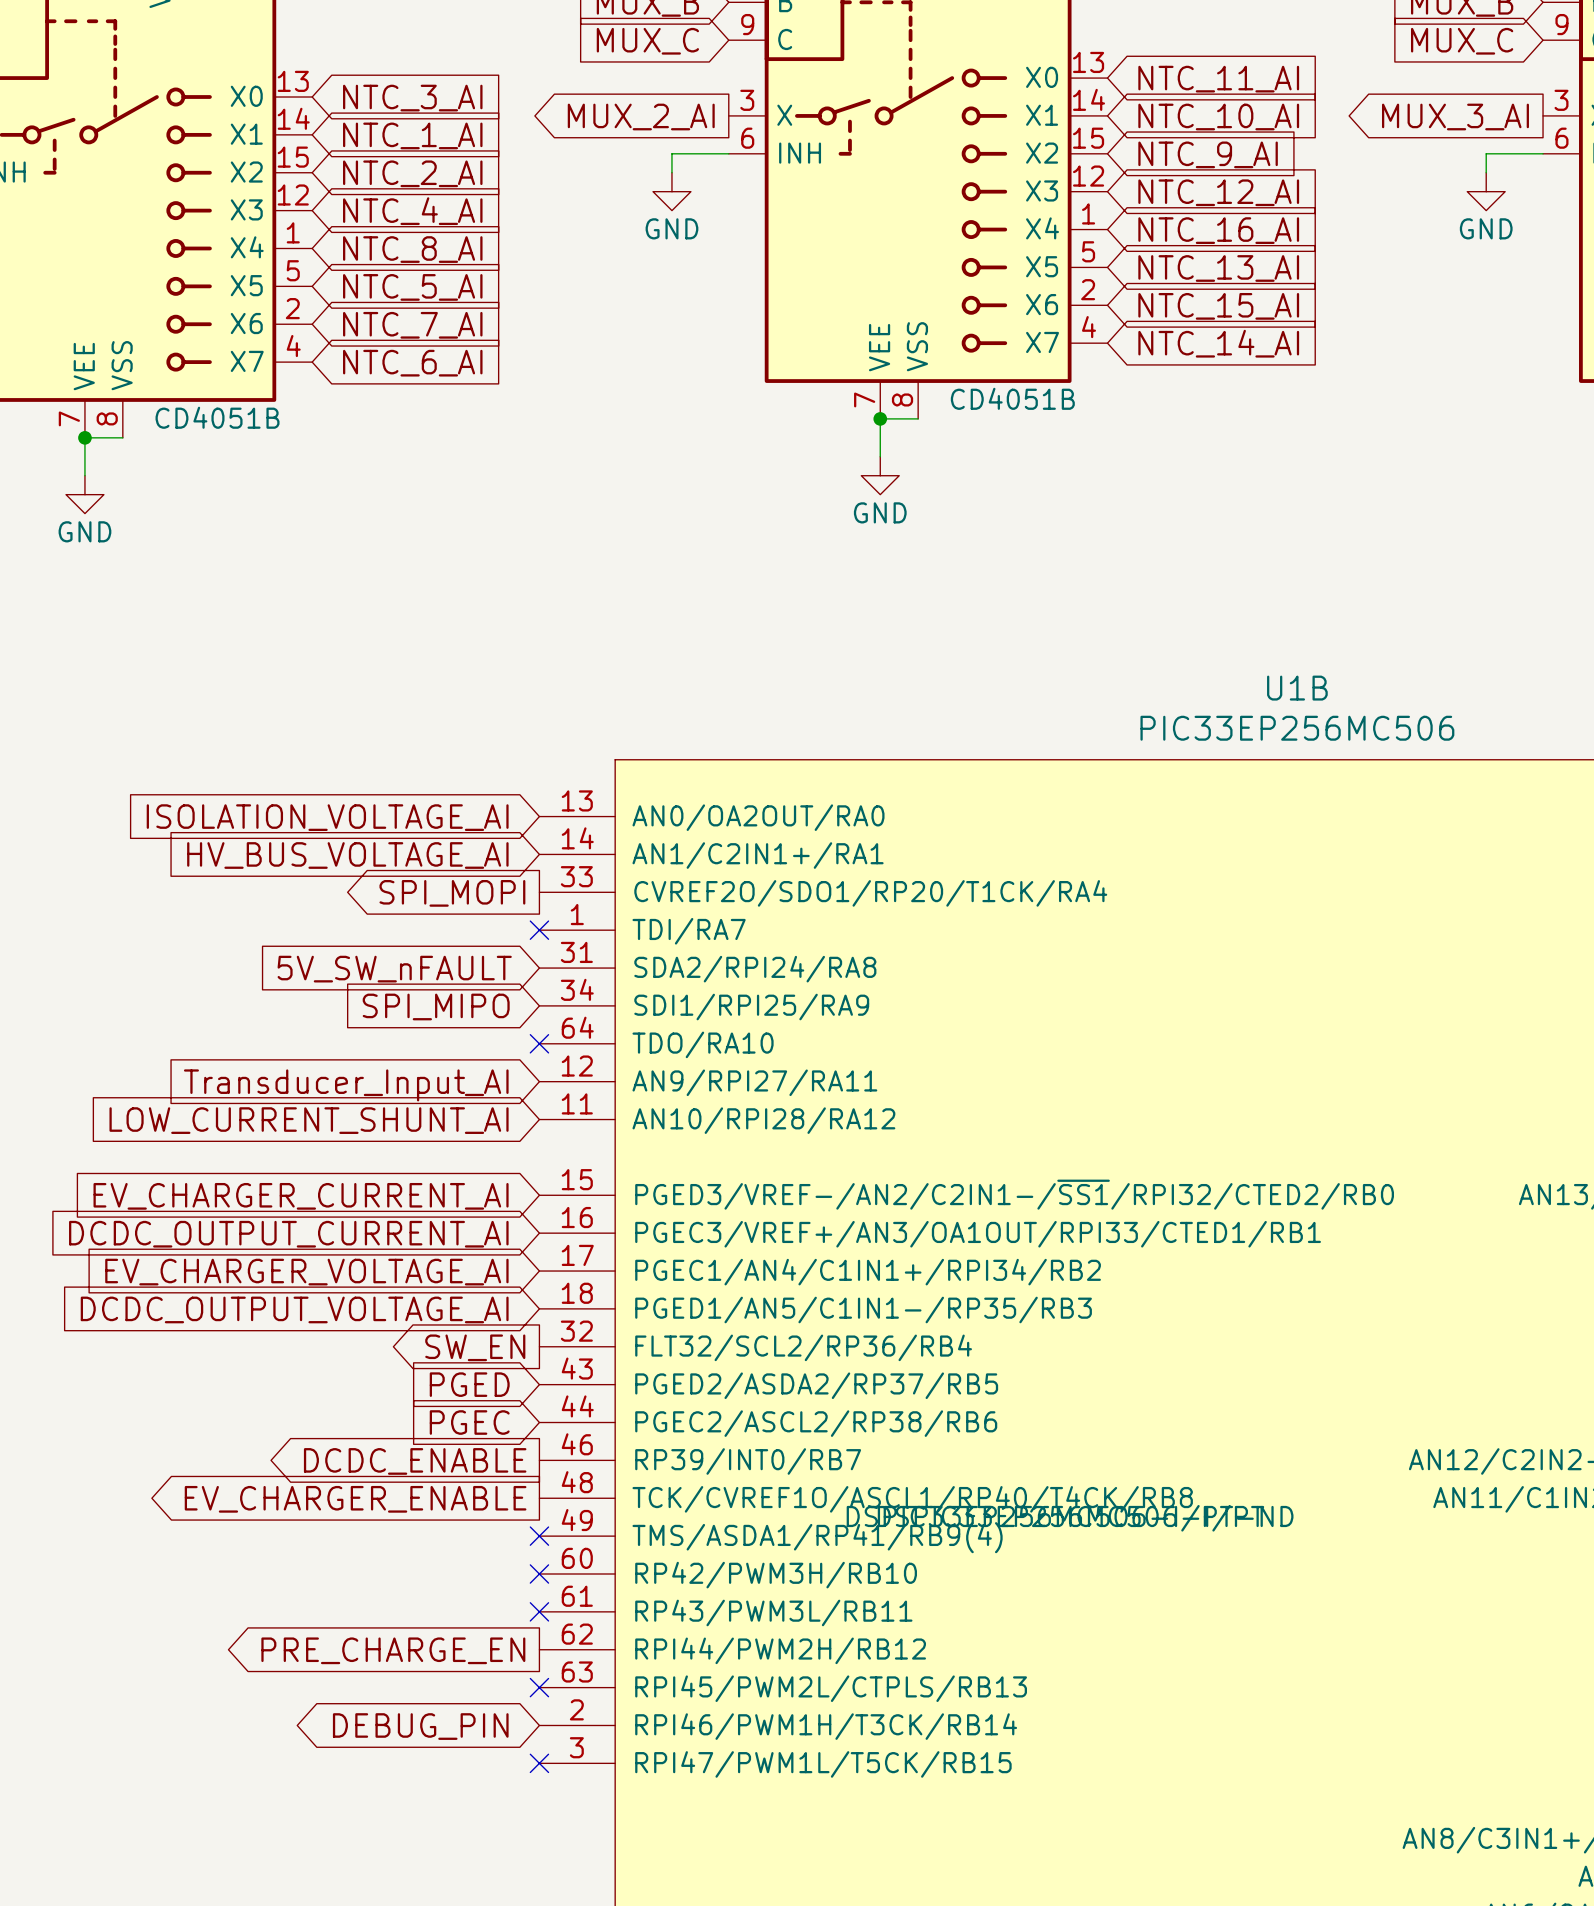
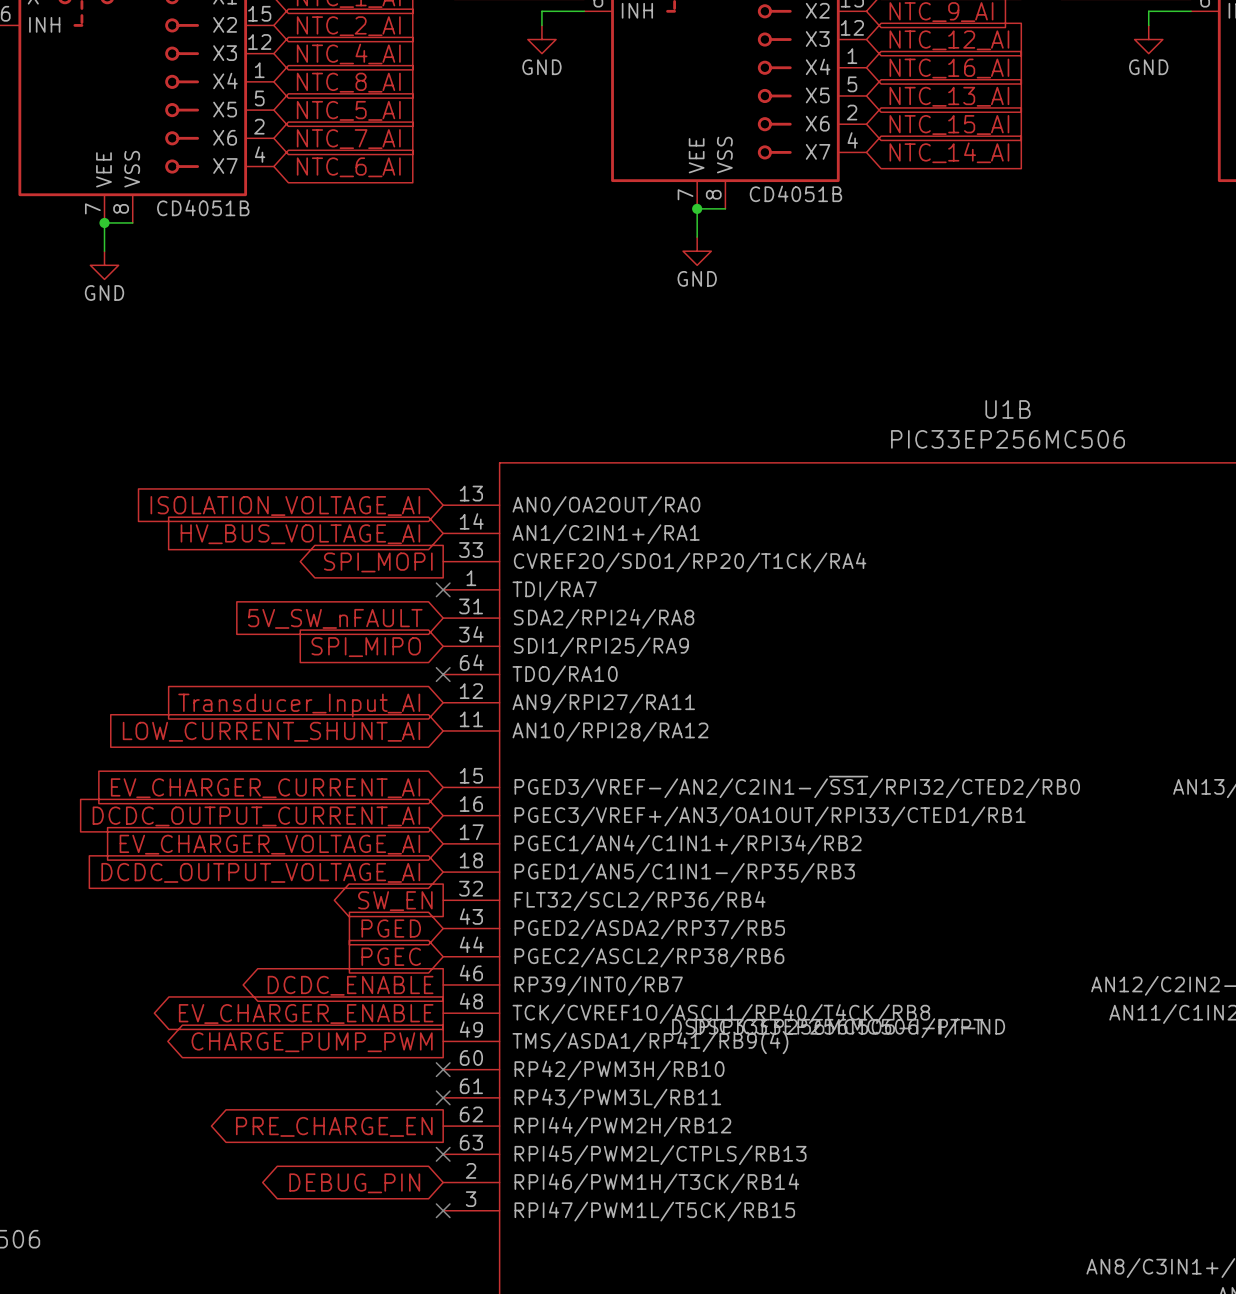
no-connect mark: (539, 1536) -> none
global label: none -> CHARGE_PUMP_PWM (312, 1042)

